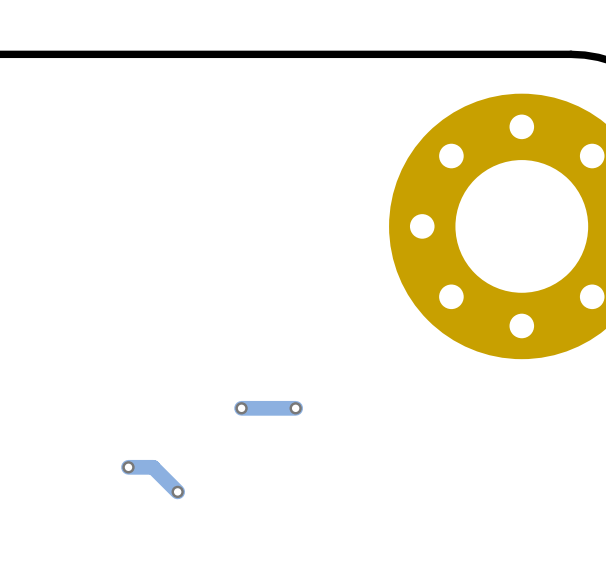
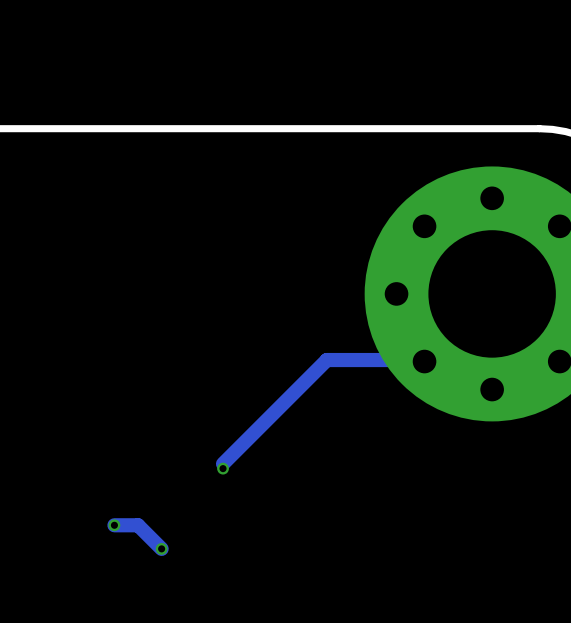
track: none -> (426, 360) (326, 360) (223, 463)
track: (295, 408) (241, 408) -> none
via: (295, 408) -> none

